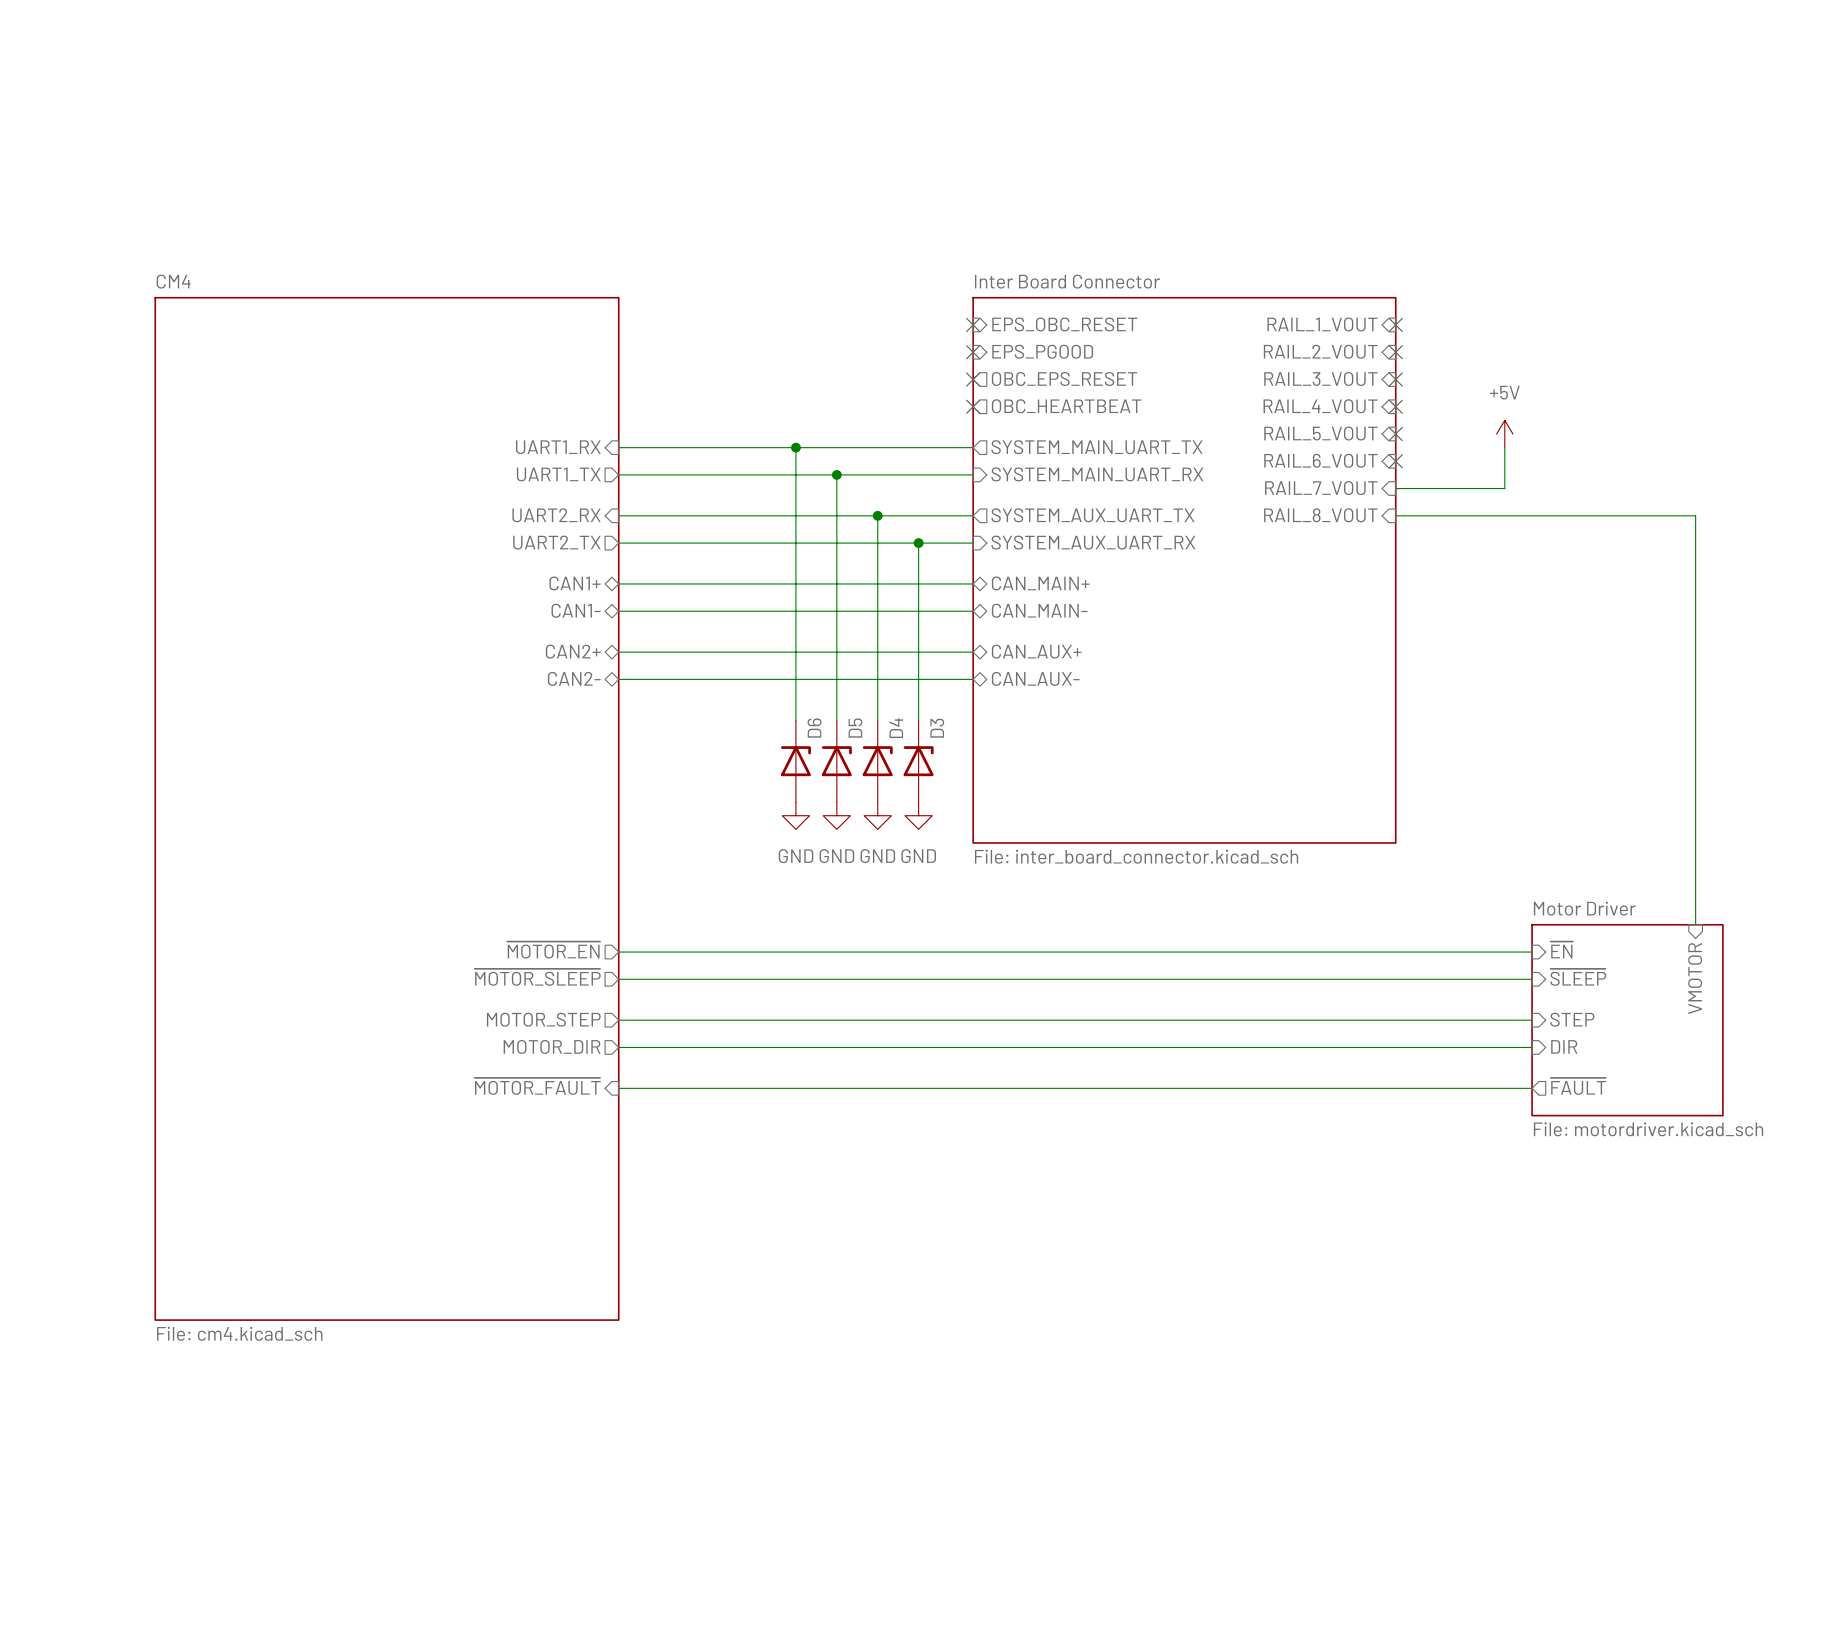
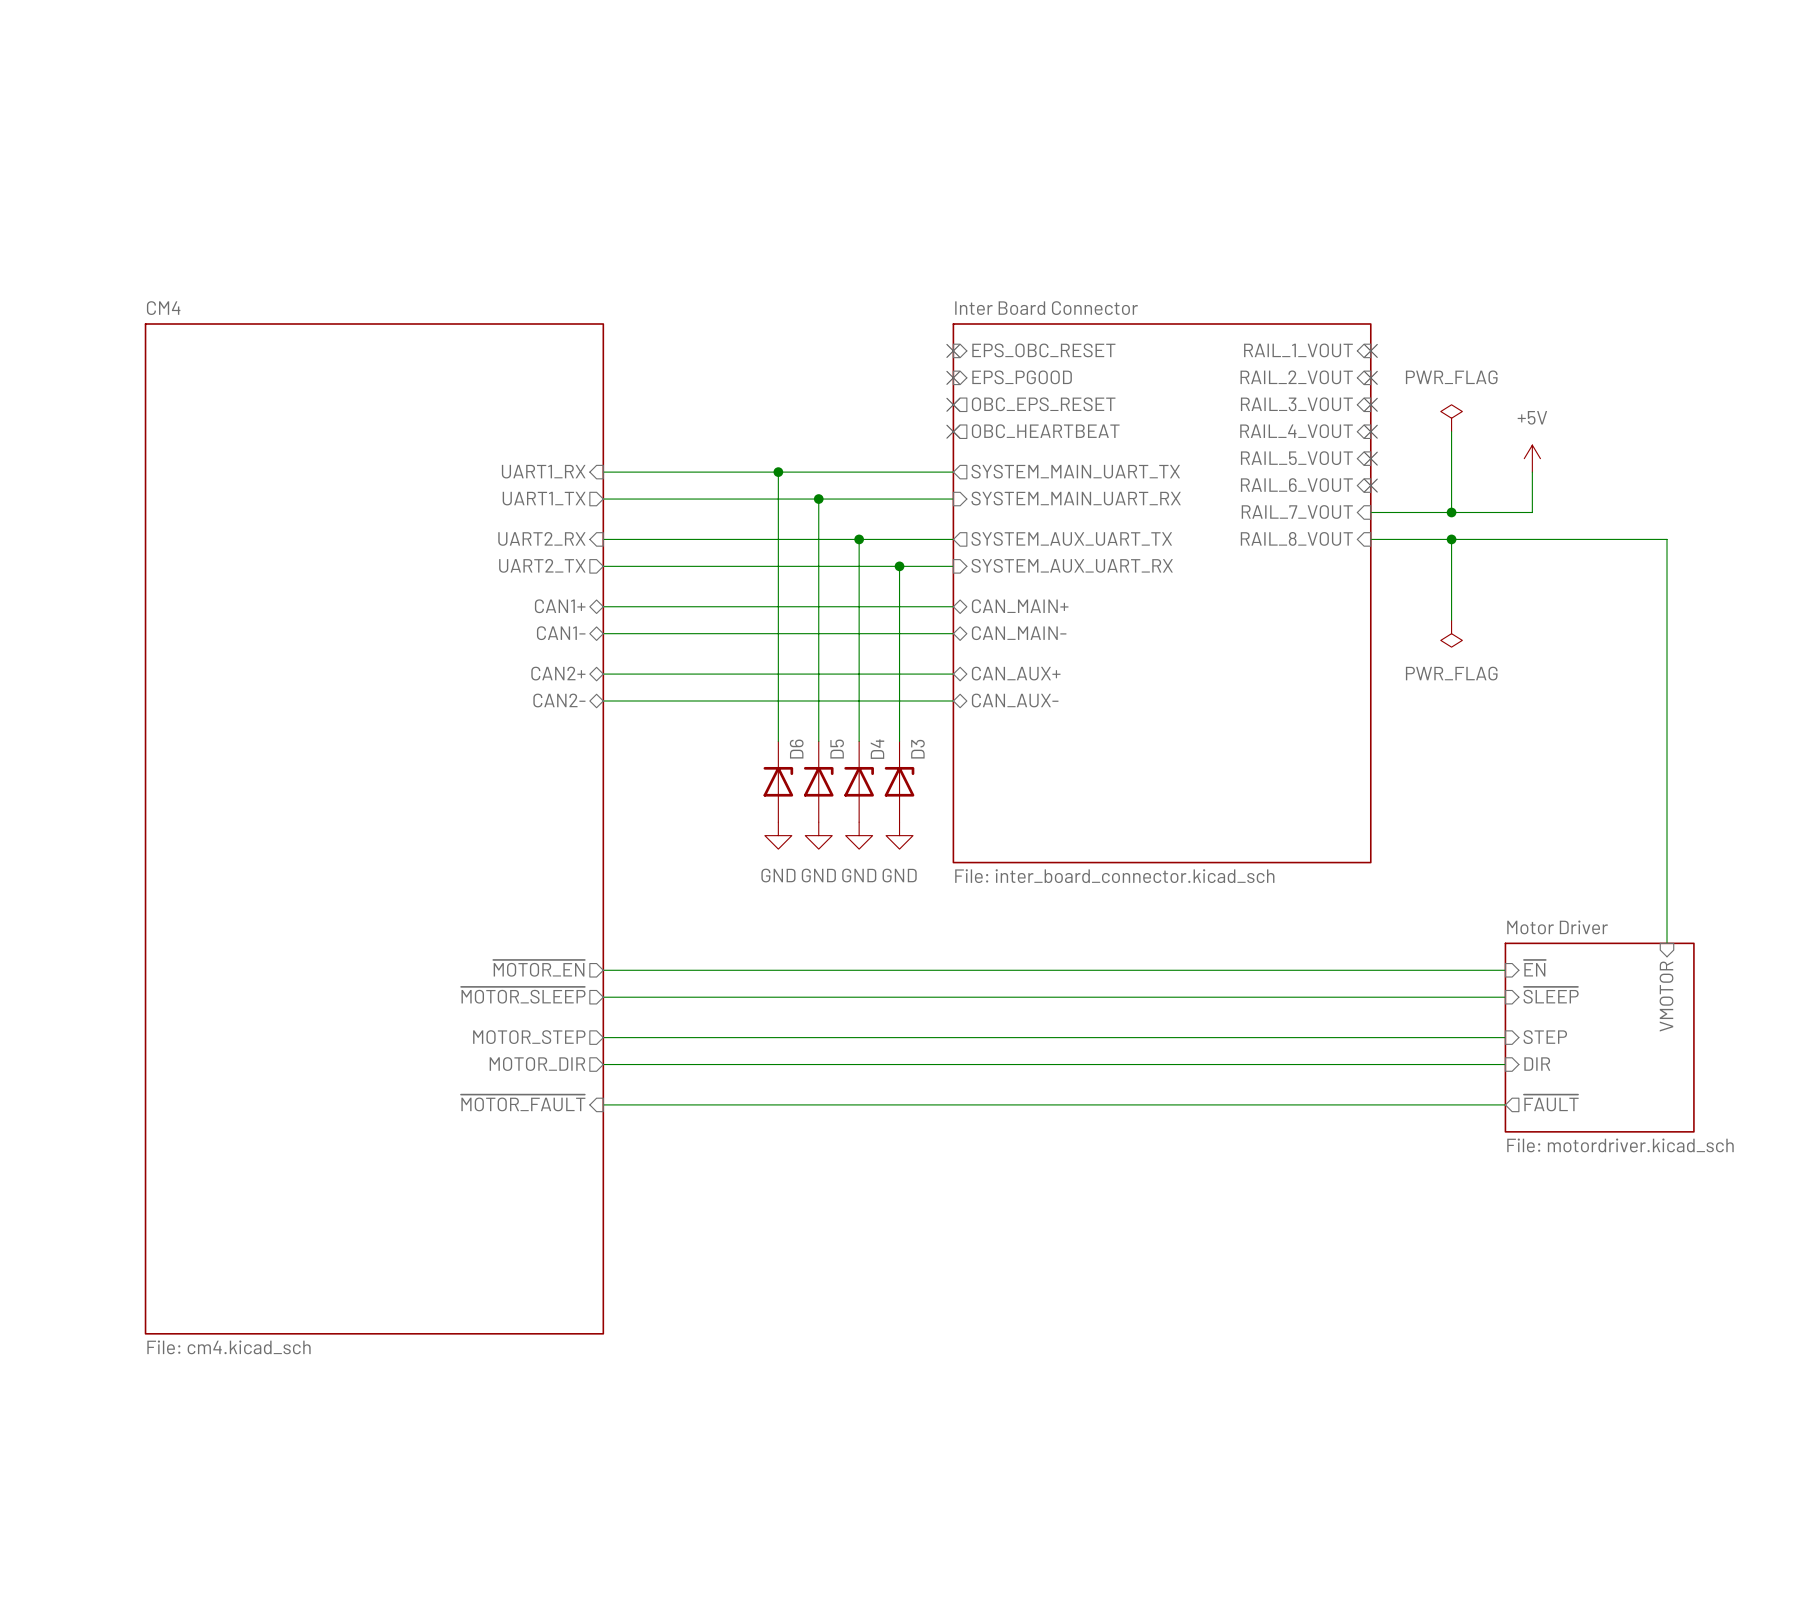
power symbol: none -> PWR_FLAG (1451, 418)
wire: none -> (1451, 431) (1451, 512)
power symbol position: +5V (1504, 434) -> +5V (1532, 458)
wire: (1504, 447) (1504, 488) -> (1532, 472) (1532, 512) (1478, 512)
junction: none -> (1451, 512)
wire: none -> (1451, 539) (1451, 620)
junction: none -> (1451, 539)
power symbol: none -> PWR_FLAG (1451, 633)

